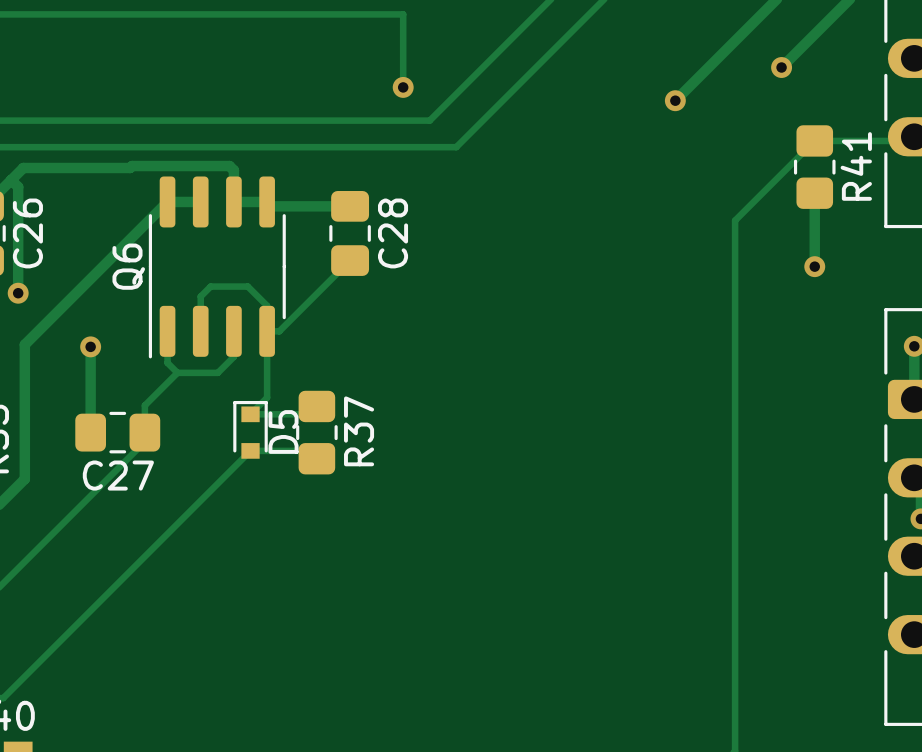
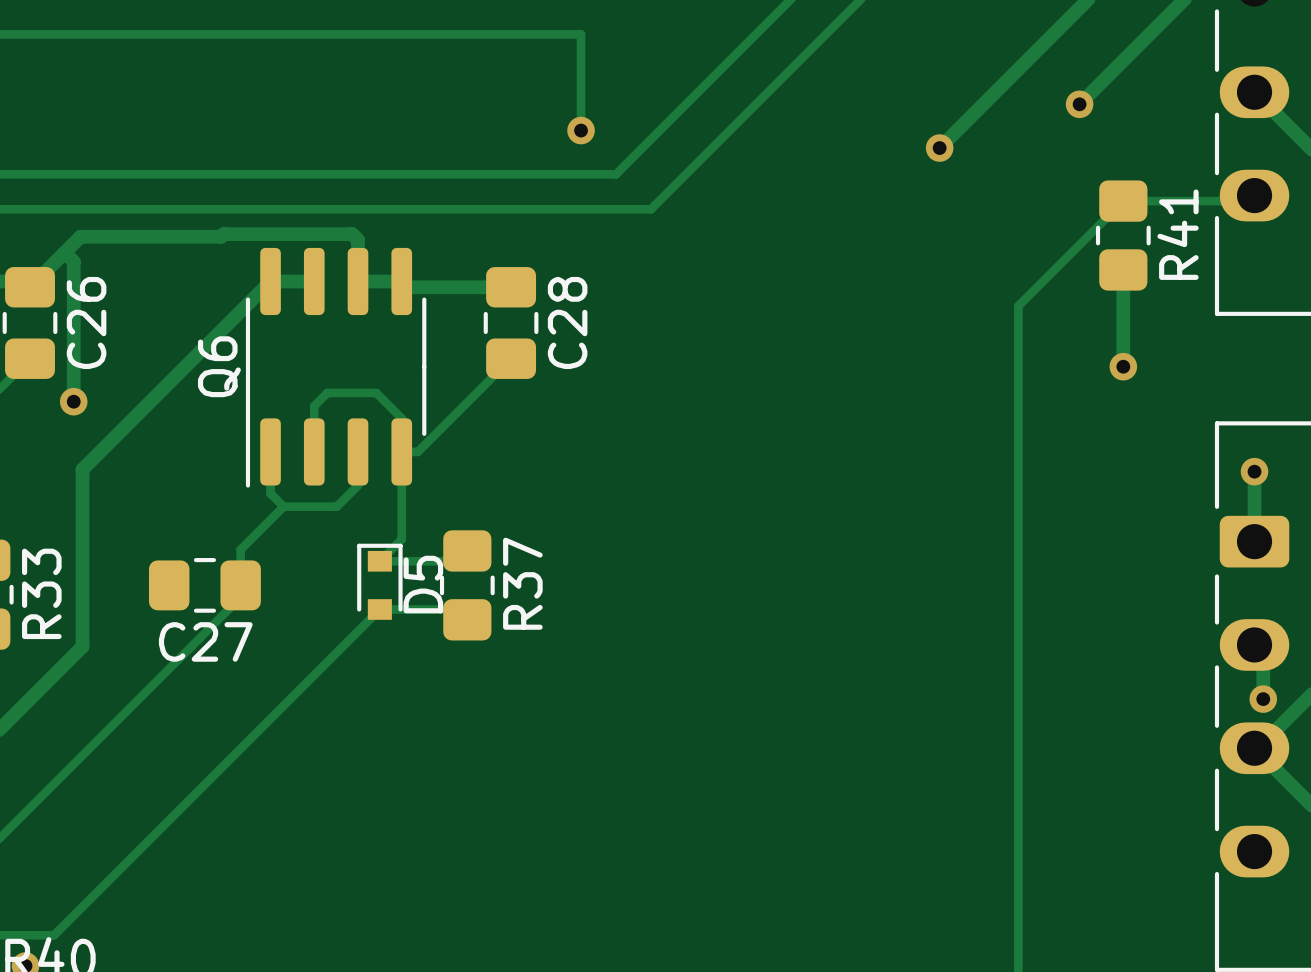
track: (90, 346) (90, 432) -> none
via: (90, 346) -> none

